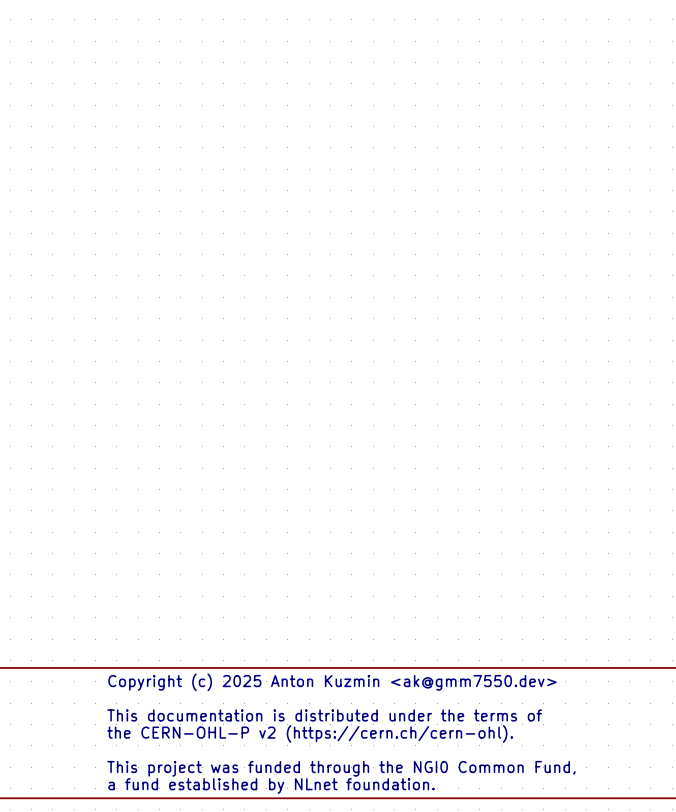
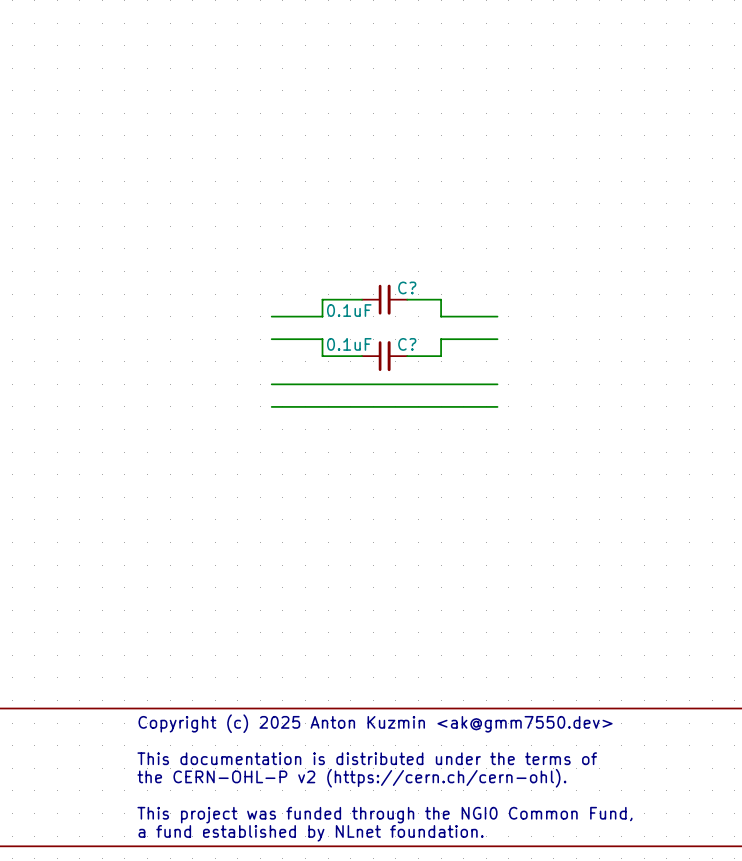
wire: none -> (362, 299) (322, 299) (322, 316) (271, 316)
C?: none -> 0.1uF (384, 299)
wire: none -> (407, 299) (441, 299) (441, 316) (497, 316)
wire: none -> (271, 339) (322, 339) (322, 356) (362, 356)
wire: none -> (497, 339) (441, 339) (441, 356) (407, 356)
C?: none -> 0.1uF (384, 356)
wire: none -> (271, 384) (497, 384)
wire: none -> (271, 406) (497, 406)

